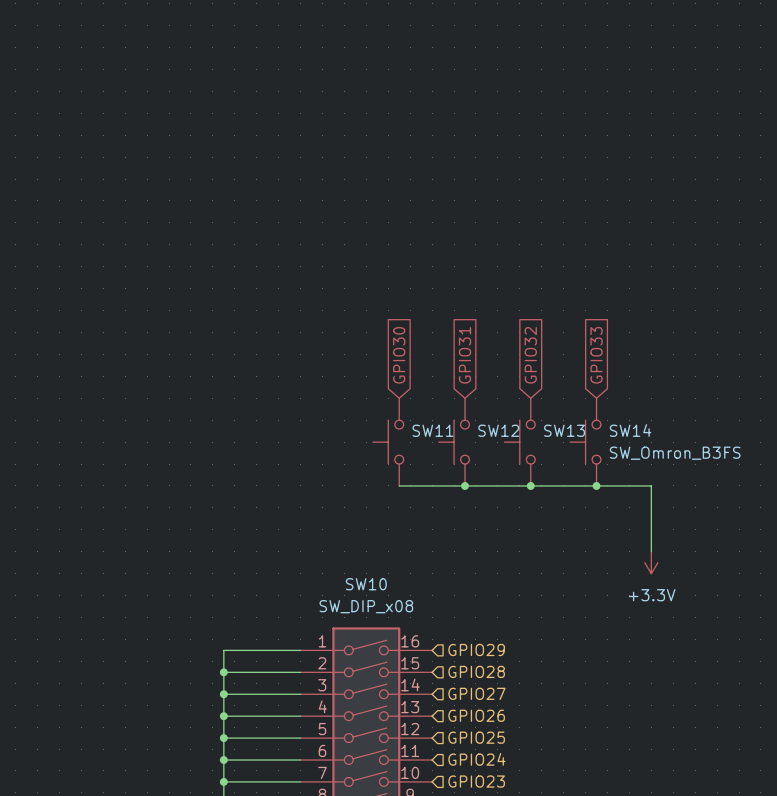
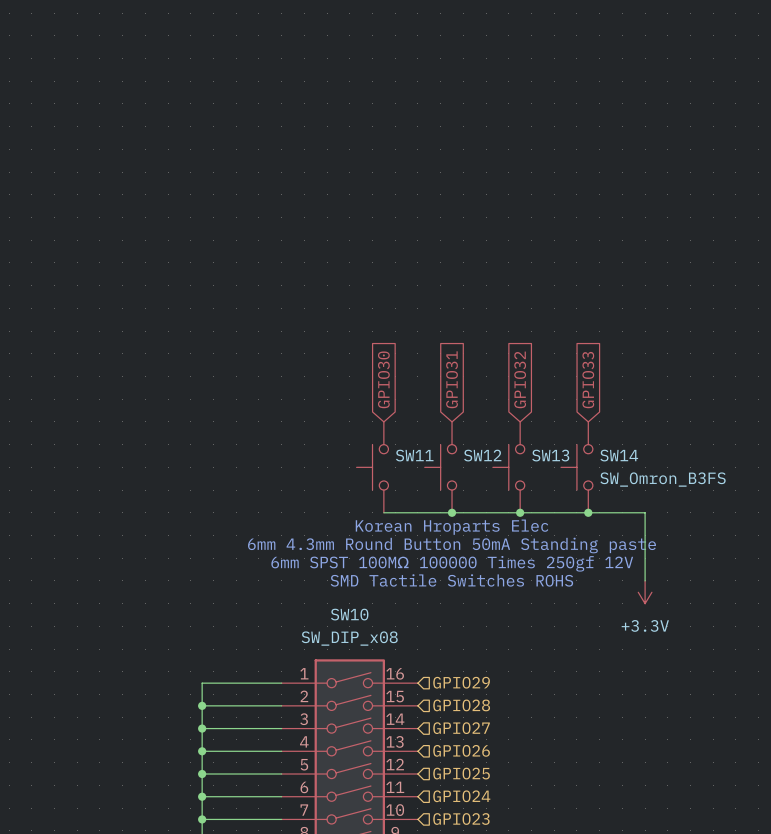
text: none -> Korean Hroparts Elec (452, 527)
text: none -> 6mm 4.3mm Round Button 50mA Standing paste (451, 545)
text: none -> 6mm SPST 100MΩ 100000 Times 250gf 12V (452, 563)
text: none -> SMD Tactile Switches ROHS (451, 580)

